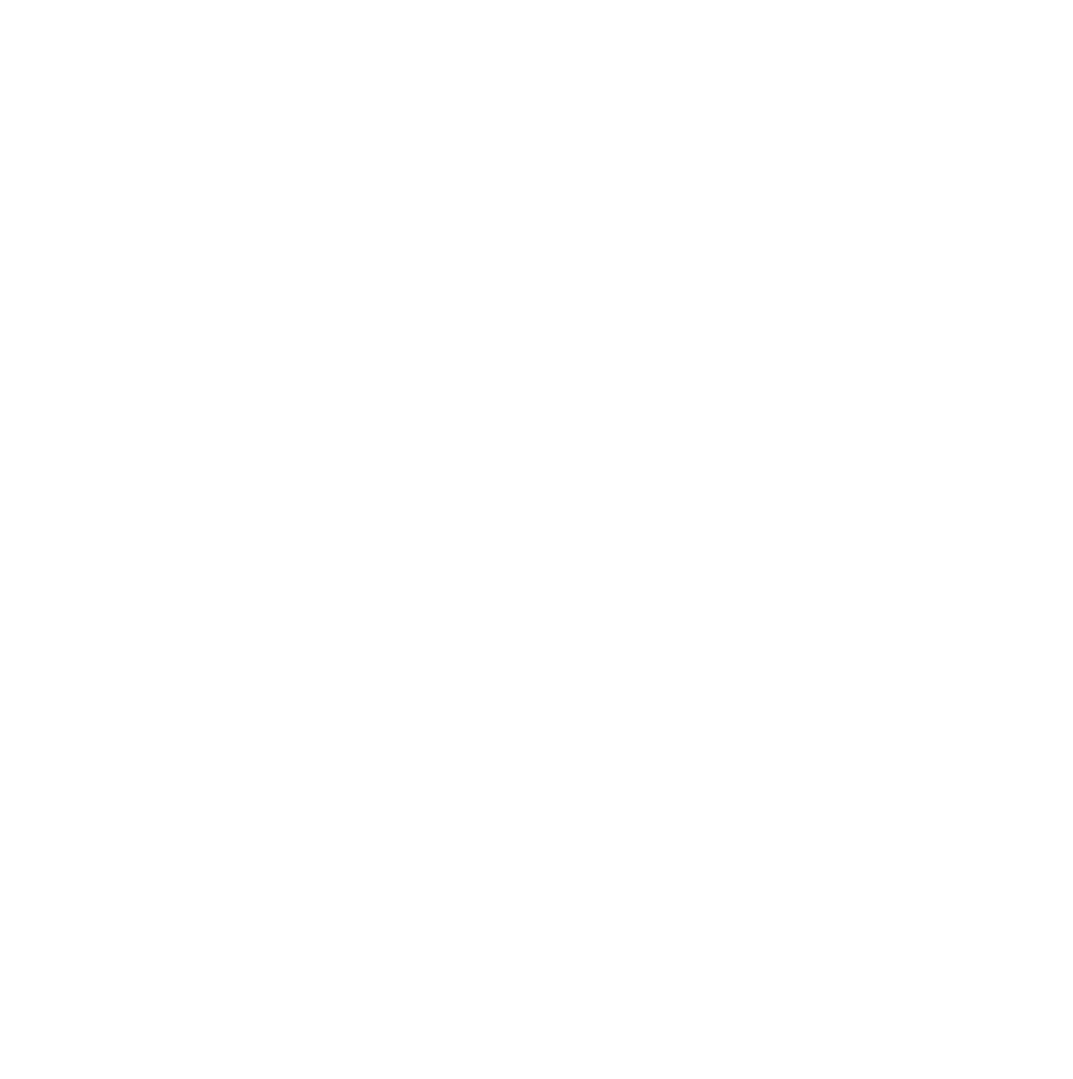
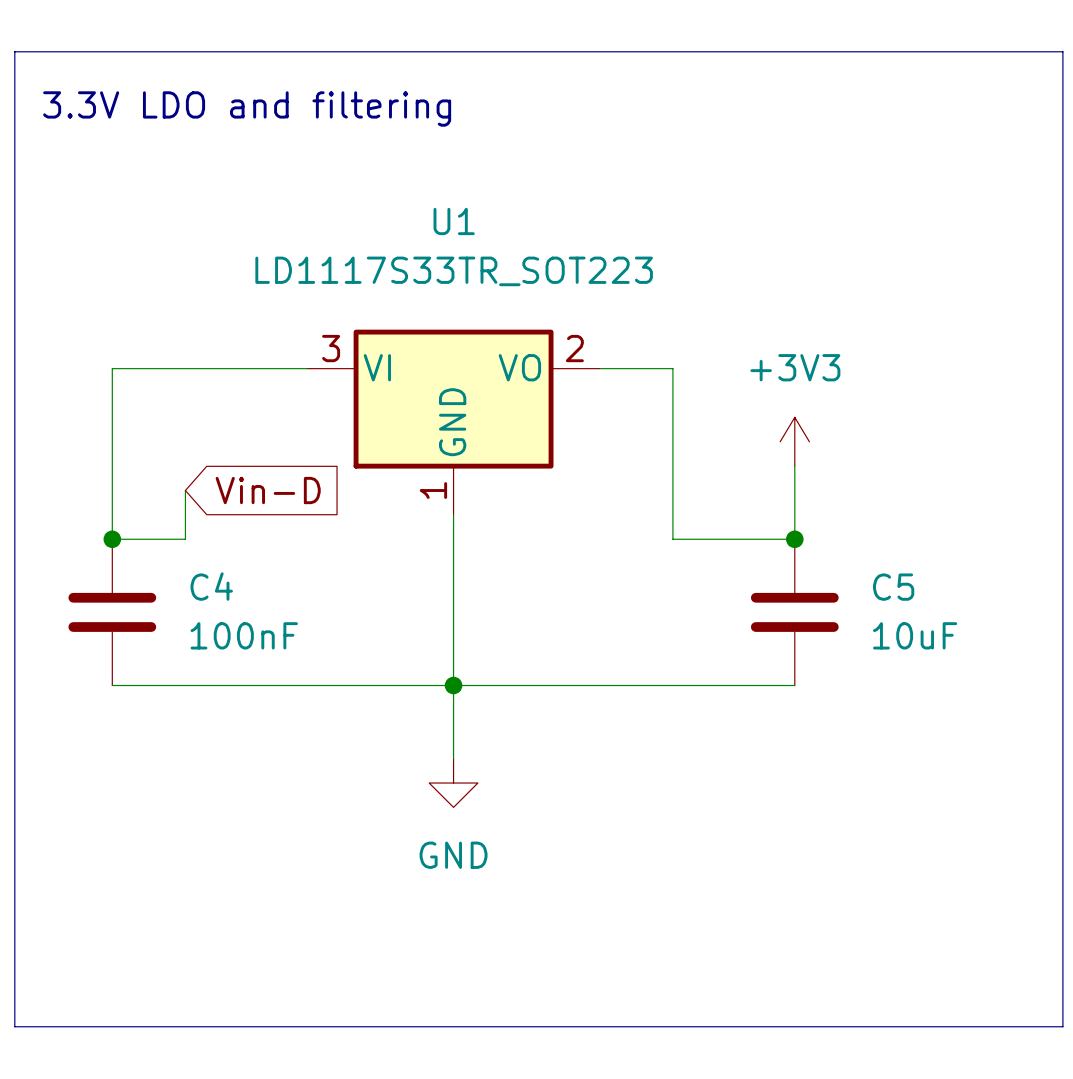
line: none -> (14, 51) (14, 1026) (1062, 1026) (1062, 51) (14, 51)
text: none -> 3.3V LDO and filtering (247, 108)
wire: none -> (307, 368) (112, 368) (112, 539) (185, 539) (185, 490)
wire: none -> (599, 368) (672, 368) (672, 539) (794, 539) (794, 466)
U1: none -> LD1117S33TR_SOT223 (453, 422)
power symbol: none -> +3V3 (794, 441)
global label: none -> Vin-D (268, 490)
wire: none -> (453, 514) (453, 758)
junction: none -> (112, 539)
junction: none -> (794, 539)
C4: none -> 100nF (112, 612)
C5: none -> 10uF (794, 612)
wire: none -> (112, 685) (794, 685)
junction: none -> (453, 685)
power symbol: none -> GND (453, 783)

